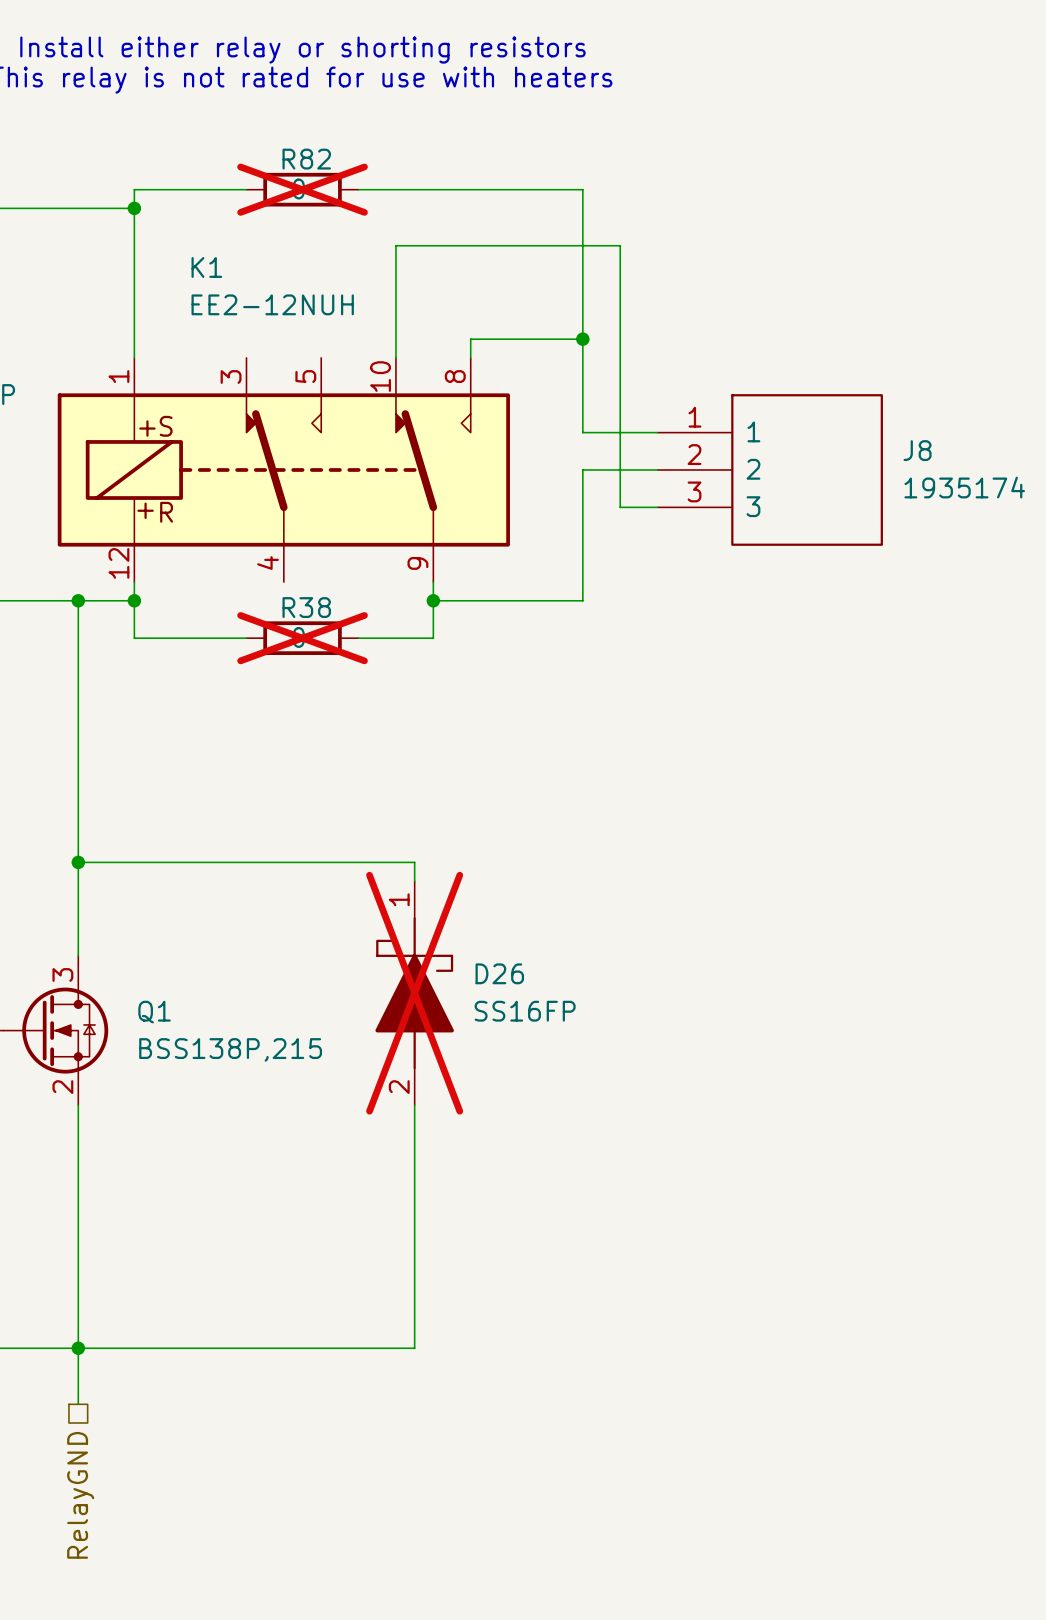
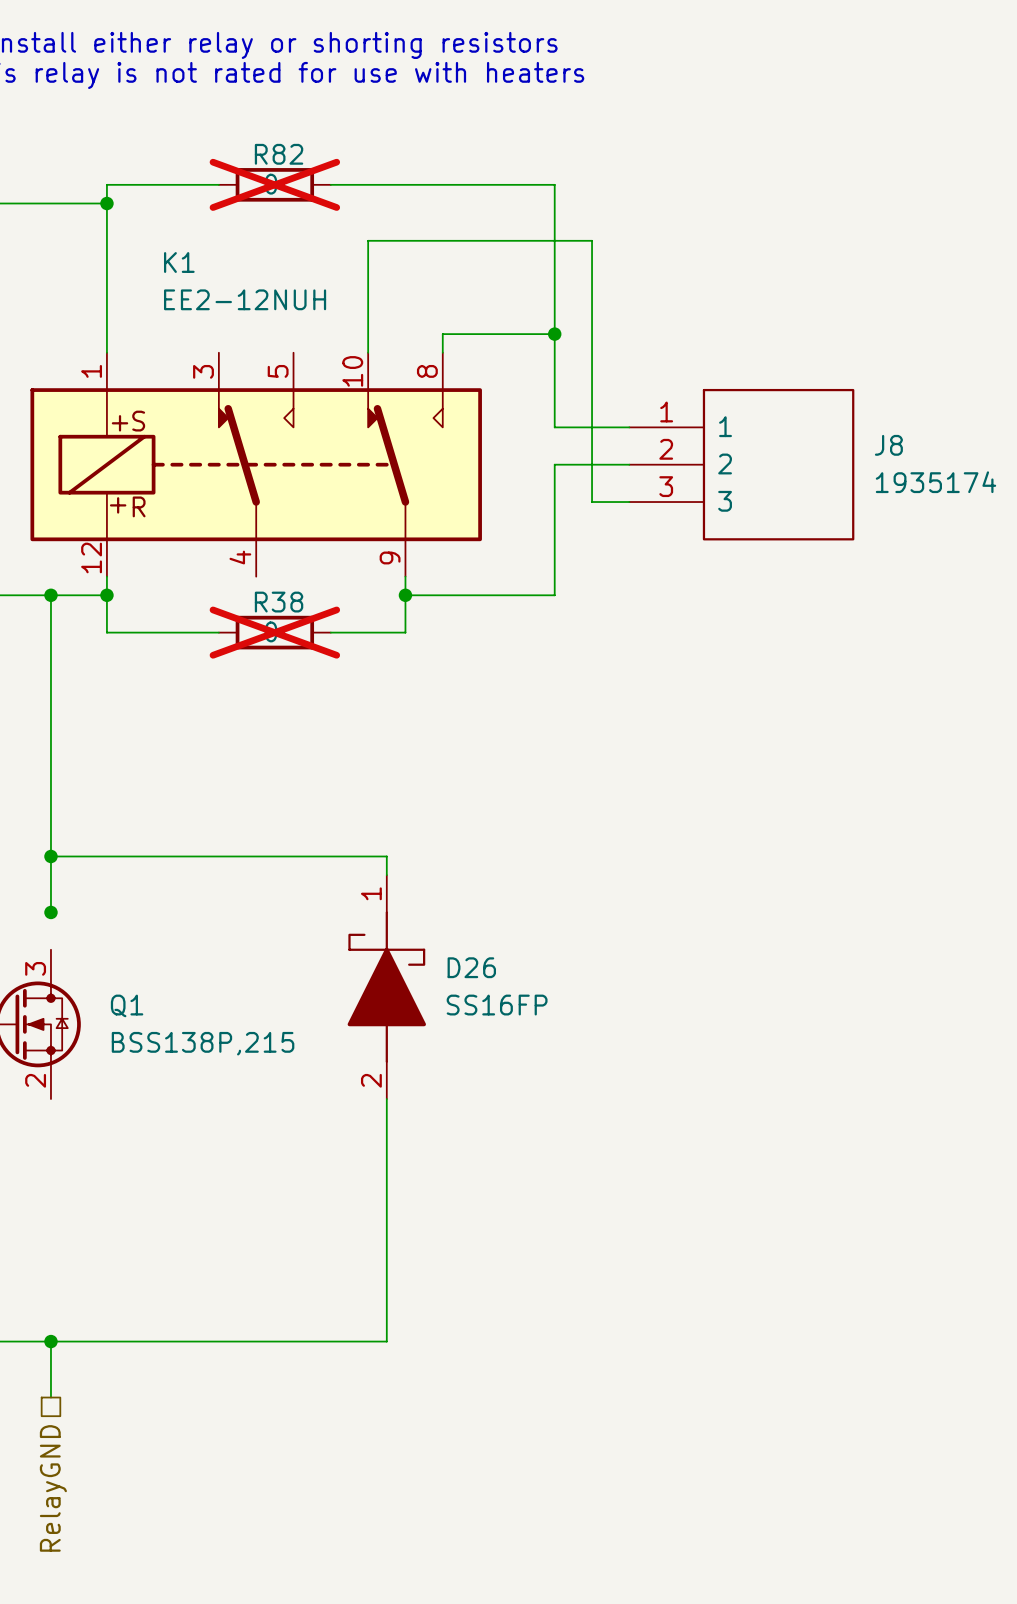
wire: (78, 918) (78, 955) -> none
junction: none -> (50, 912)
D26 do-not-place cross: (414, 993) -> none
wire: (78, 1105) (78, 1348) -> none

